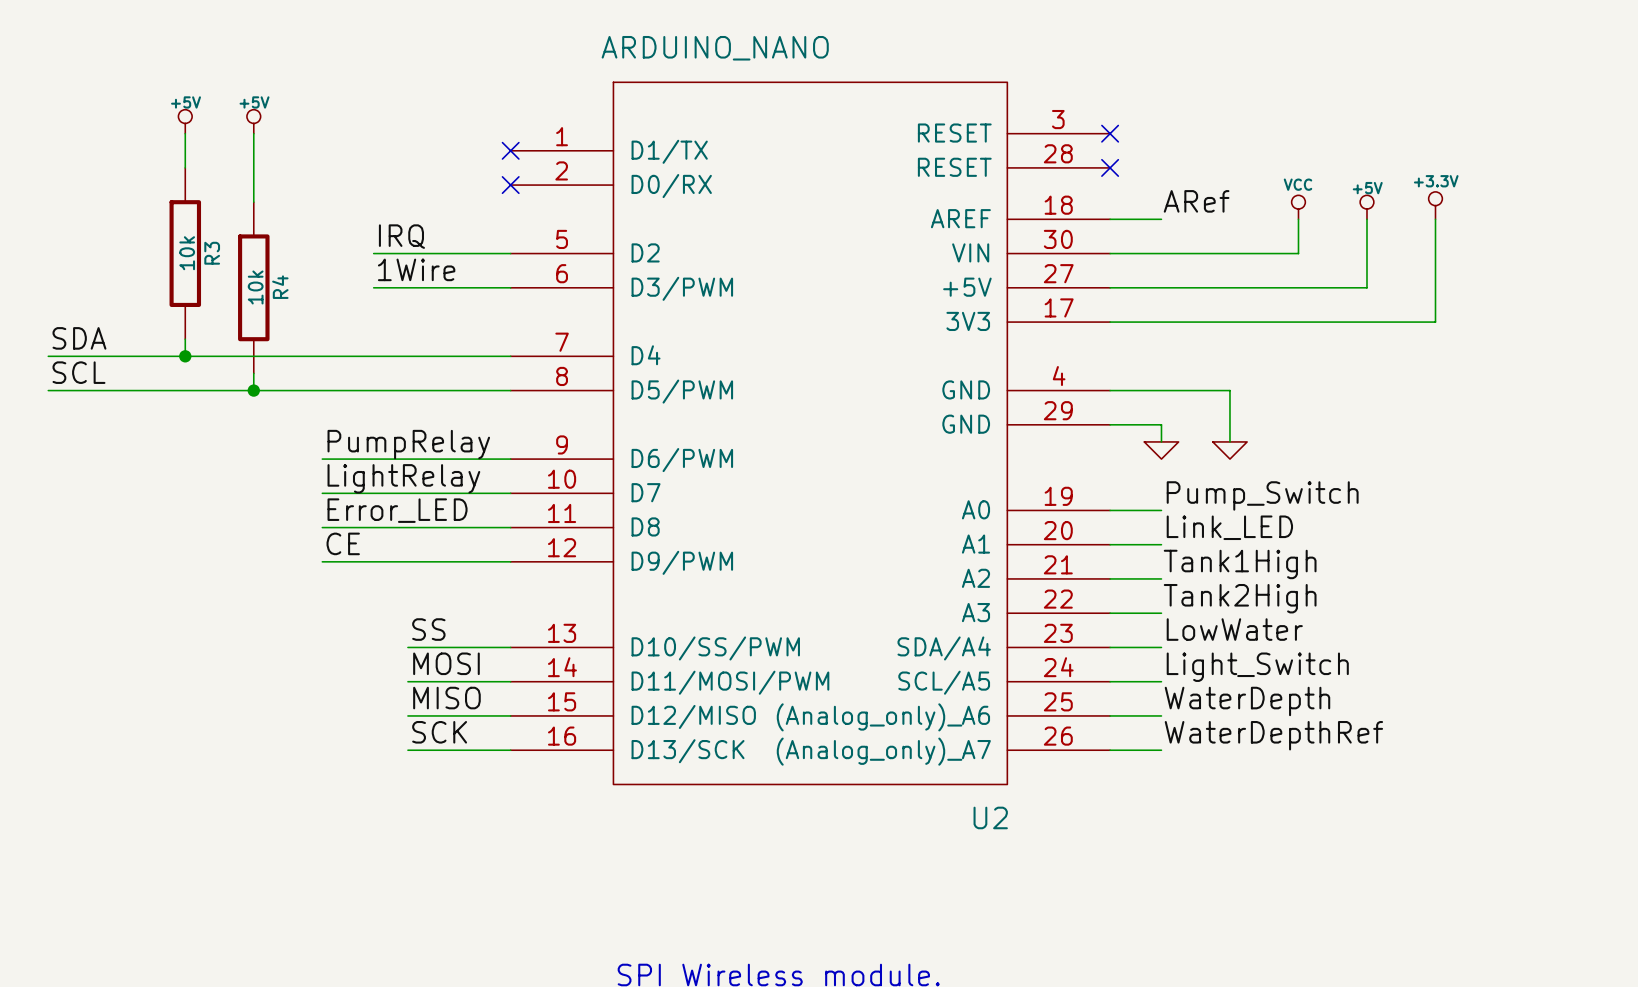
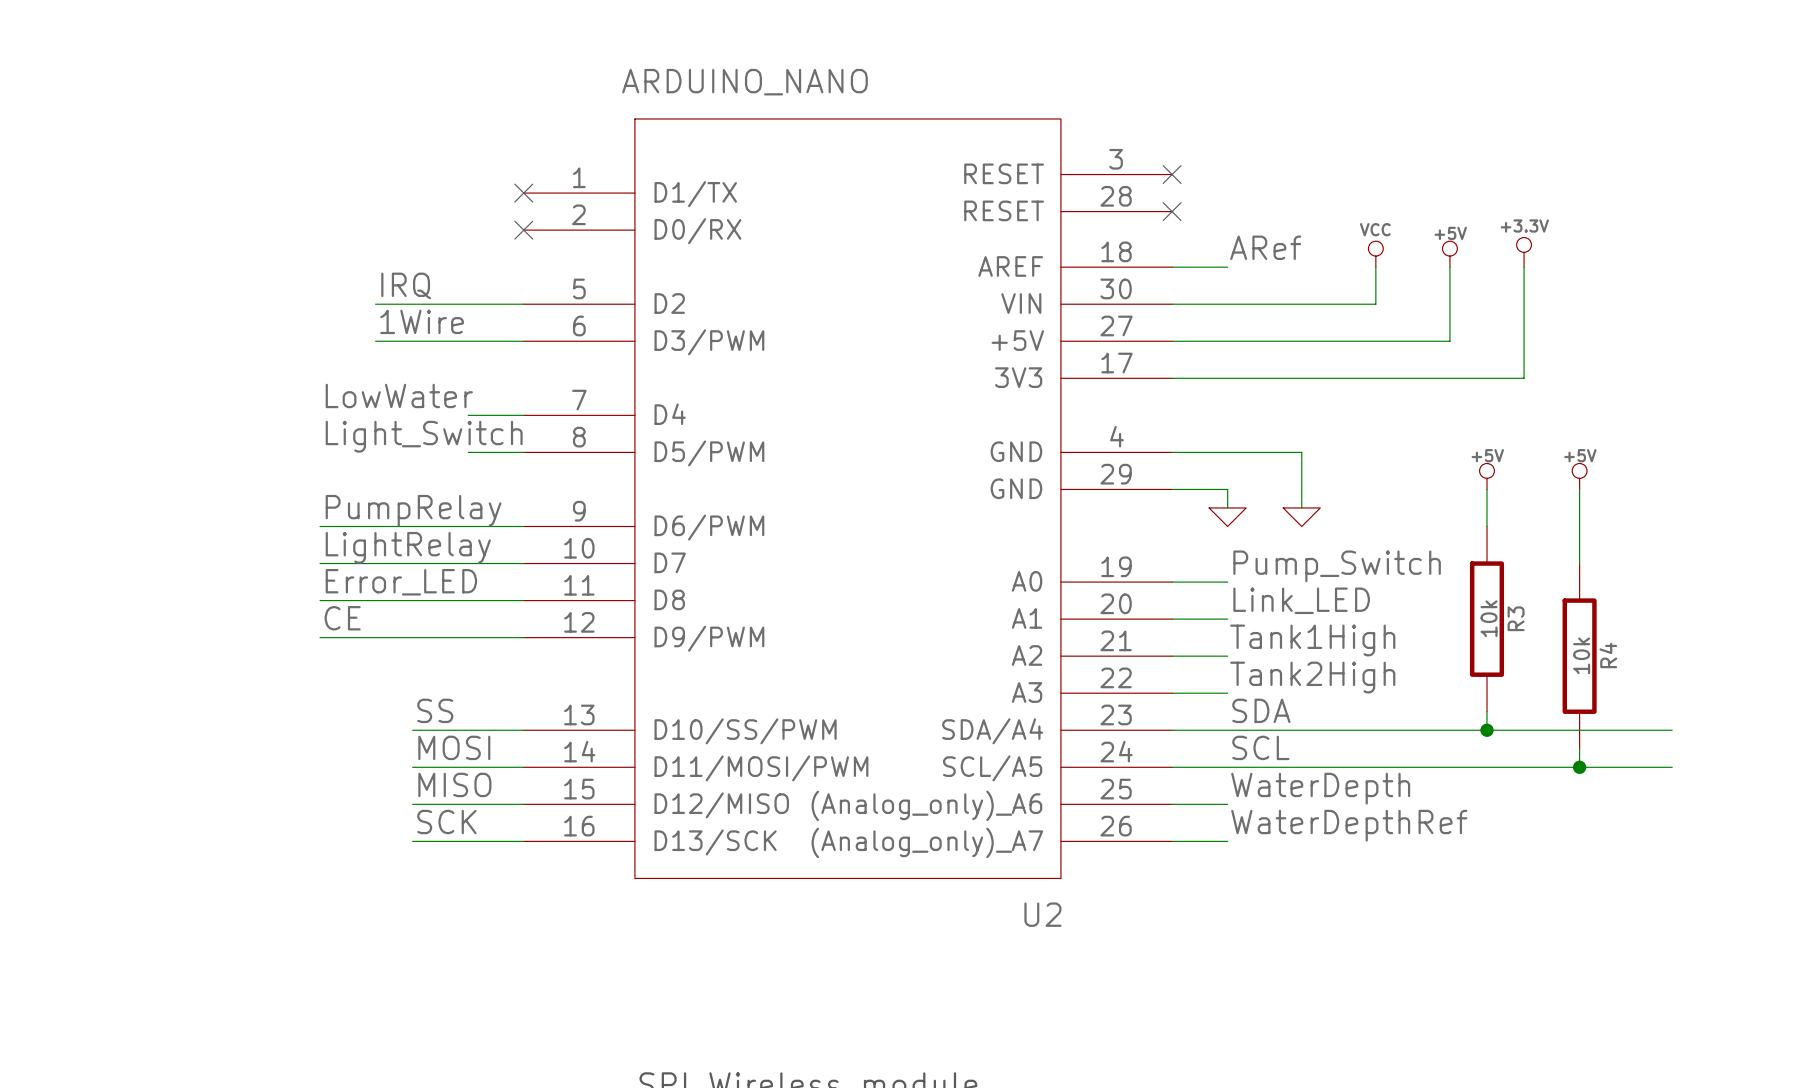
power symbol: +5V (185, 121) -> none
power symbol: +5V (253, 121) -> none
wire: (185, 133) (185, 167) -> none
wire: (253, 133) (253, 202) -> none
R3 position: (185, 253) -> (1486, 619)
R4 position: (253, 287) -> (1579, 656)
label: SDA (79, 338) -> none
label: none -> LowWater (399, 395)
wire: (185, 339) (185, 356) -> none
wire: (48, 356) (459, 356) -> none
junction: (185, 356) -> none
label: SCL (78, 372) -> none
wire: (253, 373) (253, 390) -> none
label: none -> Light_Switch (424, 436)
wire: (48, 390) (459, 390) -> none
junction: (253, 390) -> none
power symbol: none -> +5V (1486, 476)
power symbol: none -> +5V (1579, 476)
wire: none -> (1486, 489) (1486, 526)
wire: none -> (1579, 489) (1579, 563)
label: LowWater (1234, 629) -> SDA (1261, 710)
wire: none -> (1486, 711) (1486, 730)
wire: none -> (1227, 730) (1672, 730)
junction: none -> (1486, 730)
wire: none -> (1579, 748) (1579, 767)
label: Light_Switch (1257, 667) -> SCL (1260, 747)
wire: none -> (1227, 767) (1672, 767)
junction: none -> (1579, 767)

